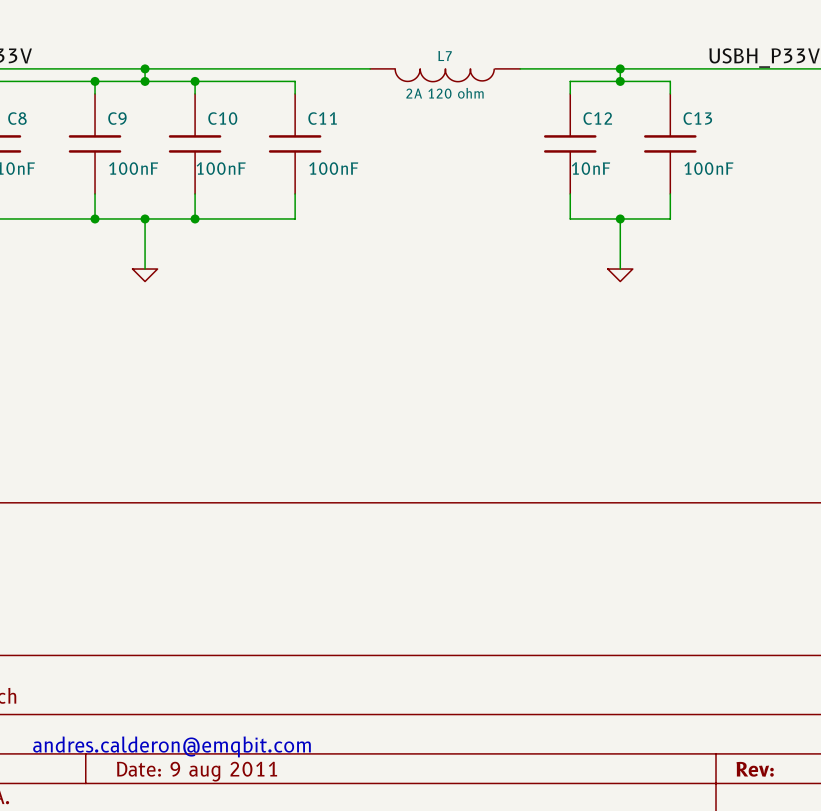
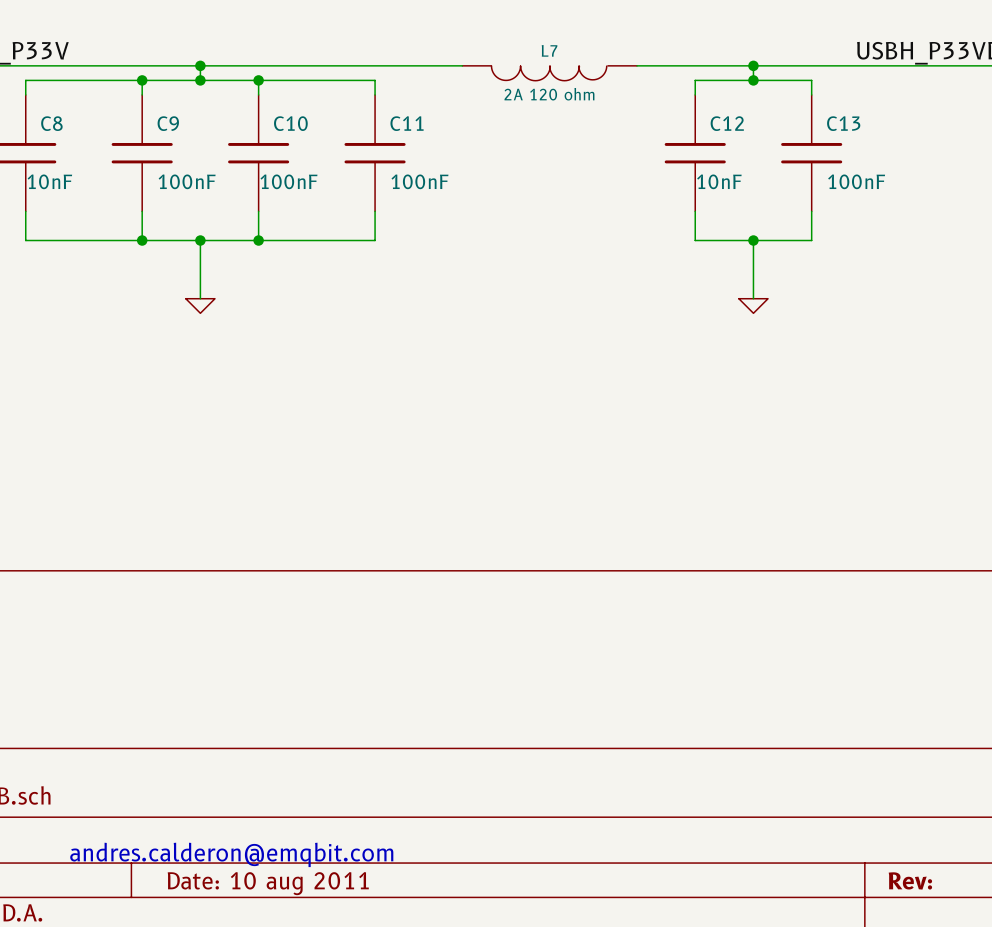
title block: Date: 9 aug 2011 (197, 771) -> Date: 10 aug 2011 (268, 883)

